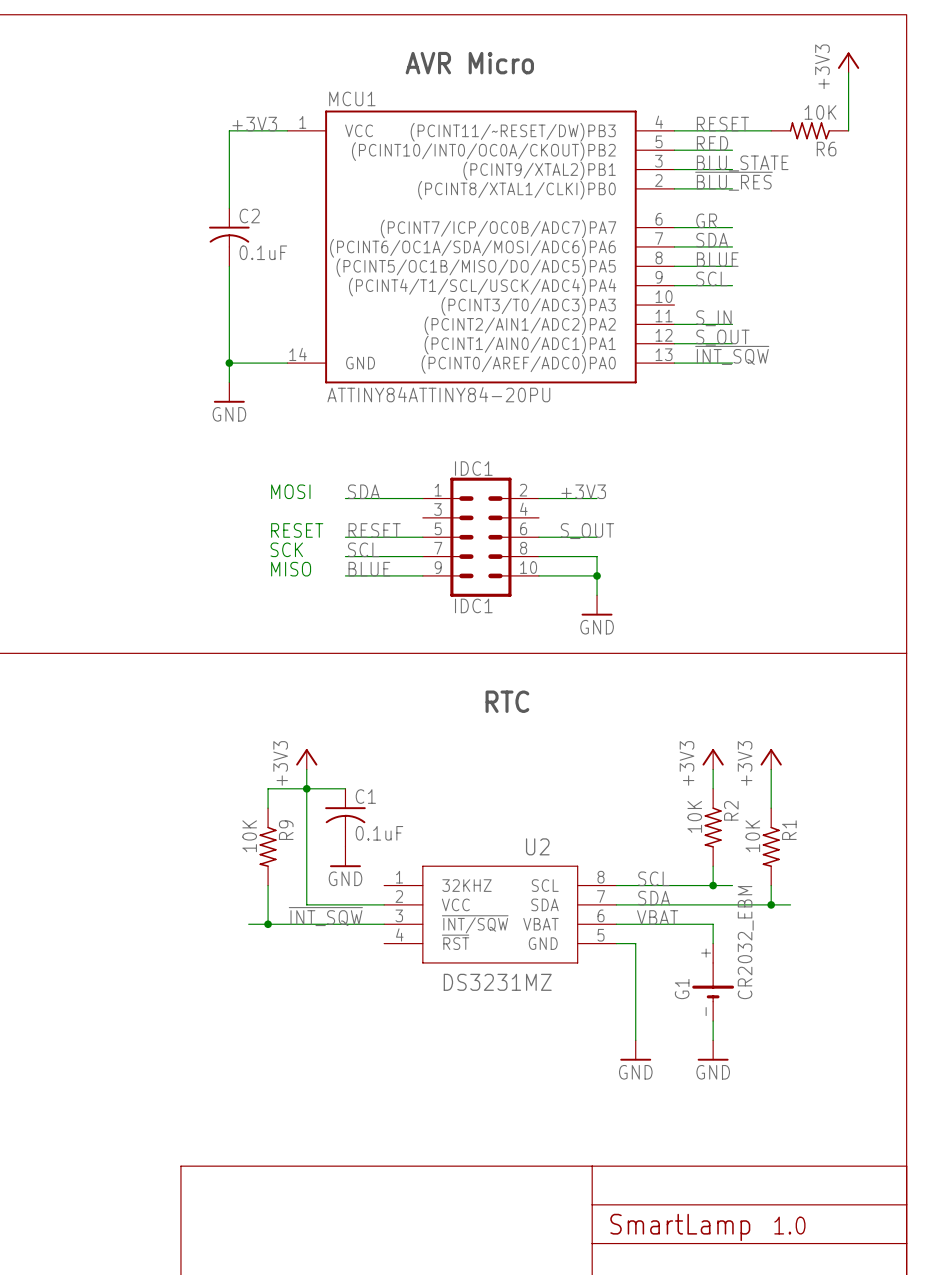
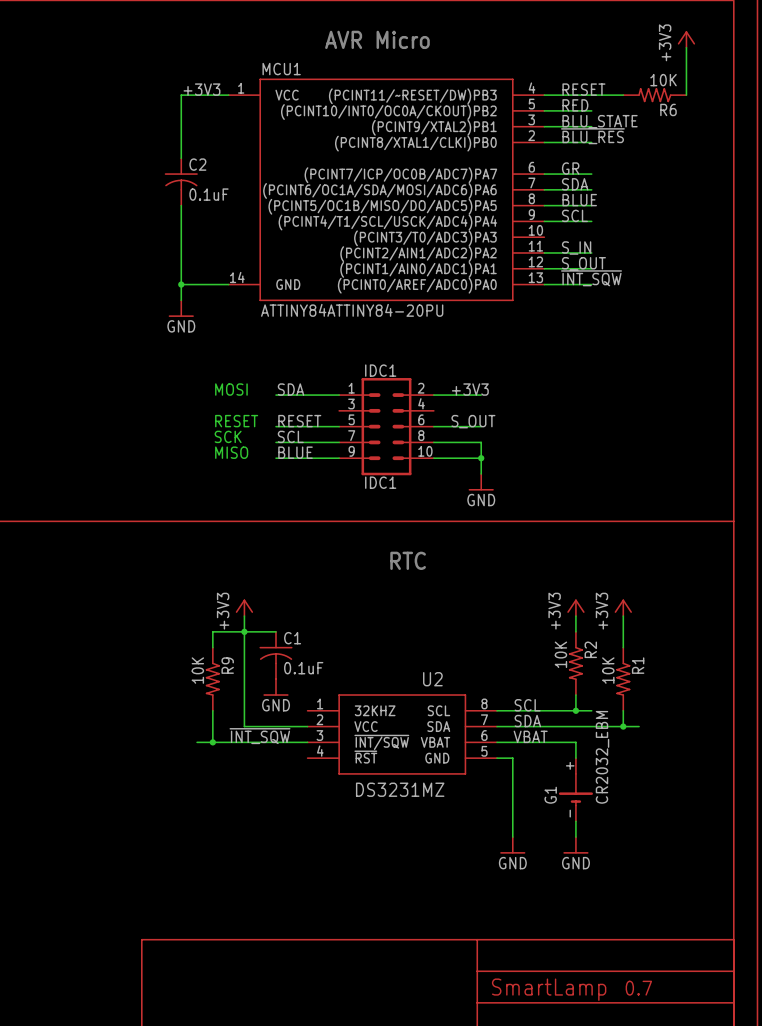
text: 1.0 (789, 1225) -> 0.7 (638, 988)

